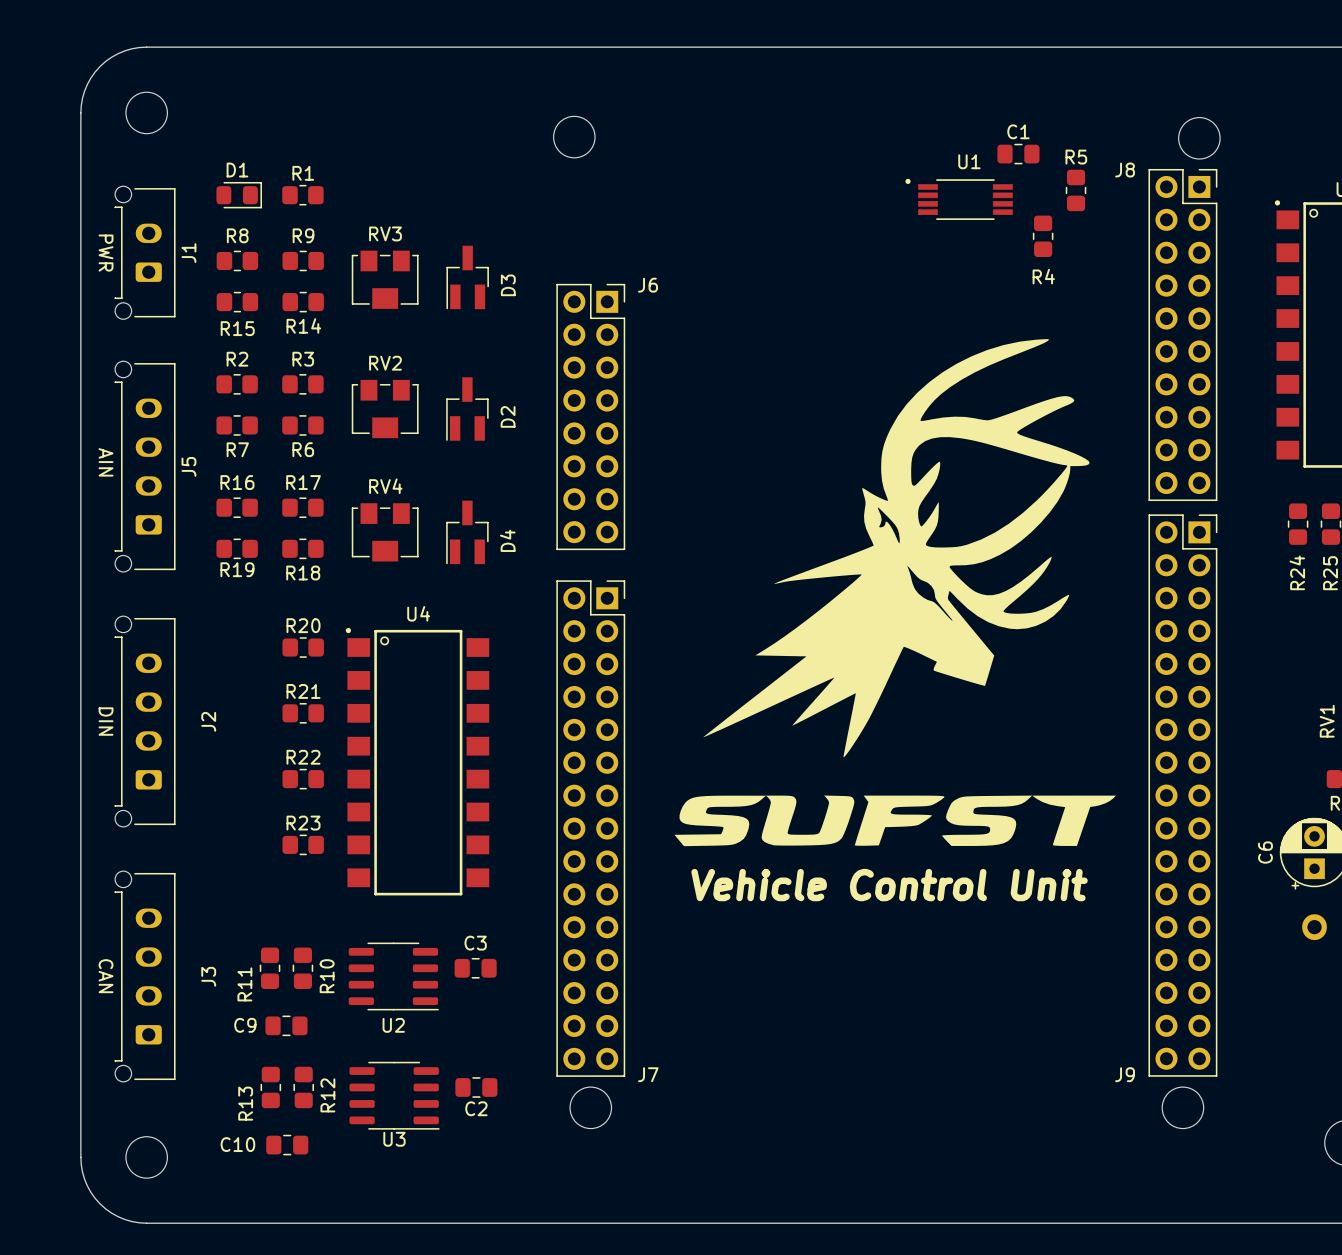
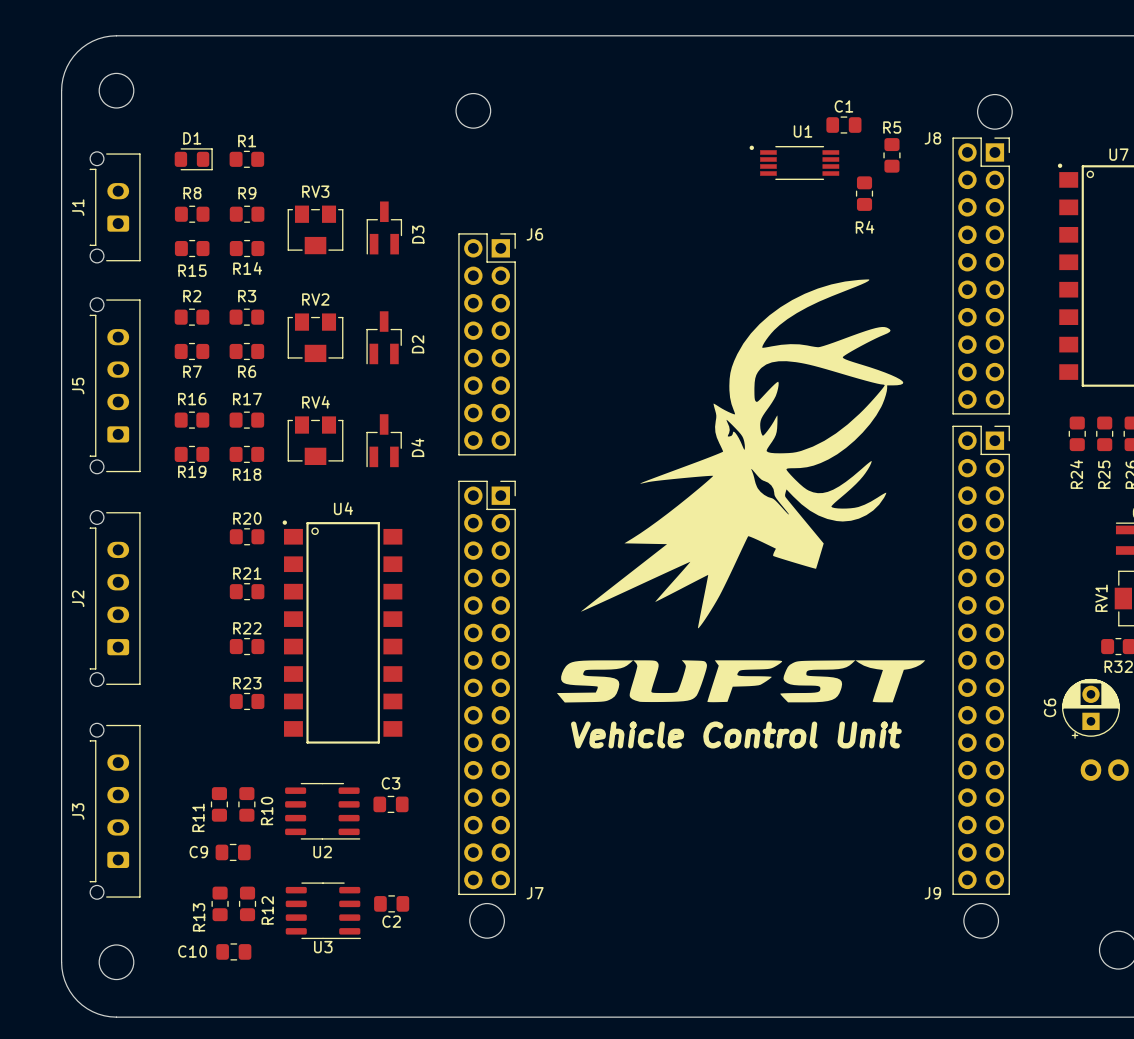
text: PWR (106, 253) -> none
J1 name position: J1 (188, 253) -> J1 (78, 207)
text: AIN (106, 462) -> none
J5 name position: J5 (188, 466) -> J5 (78, 386)
text: DIN (106, 721) -> none
J2 name position: J2 (208, 721) -> J2 (78, 598)
text: CAN (106, 976) -> none
J3 name position: J3 (208, 976) -> J3 (78, 811)

